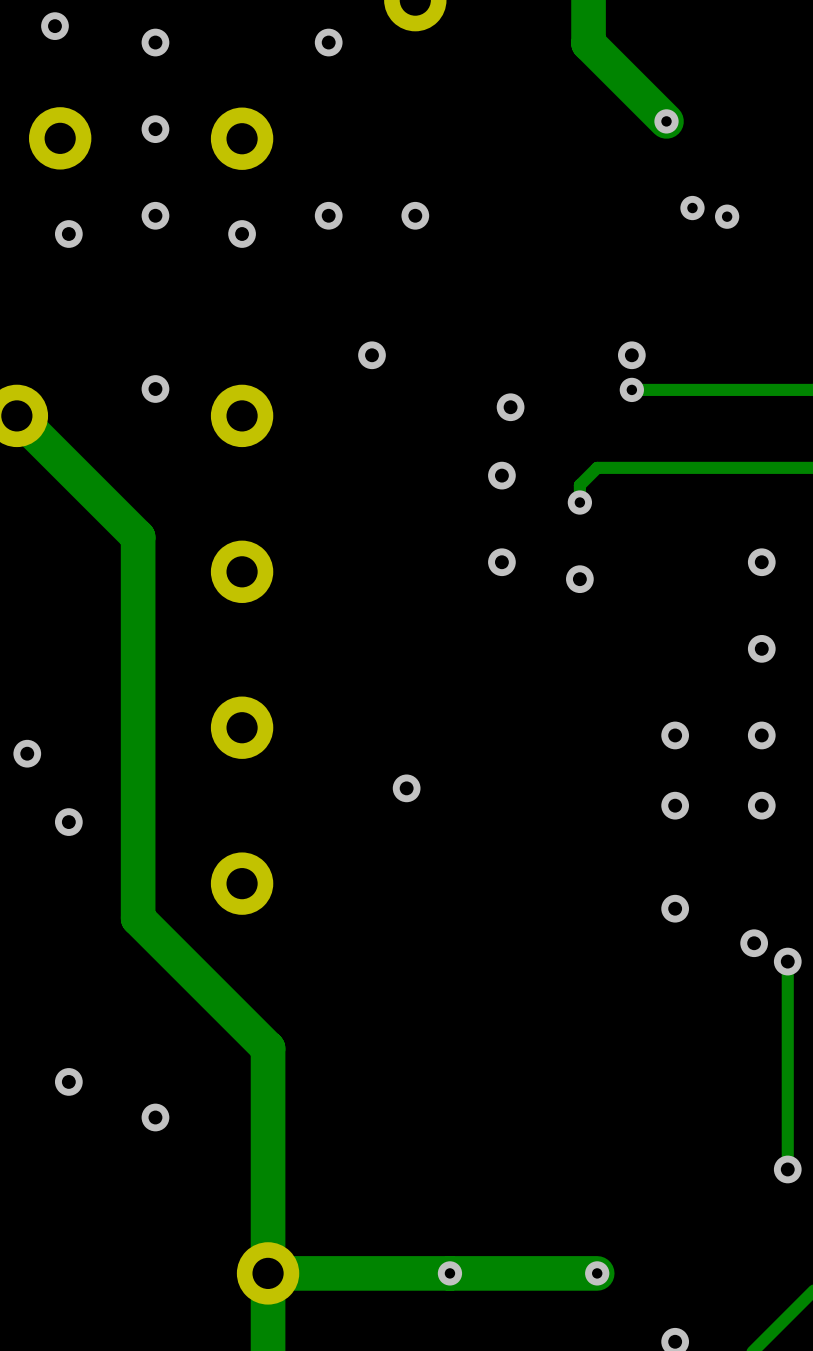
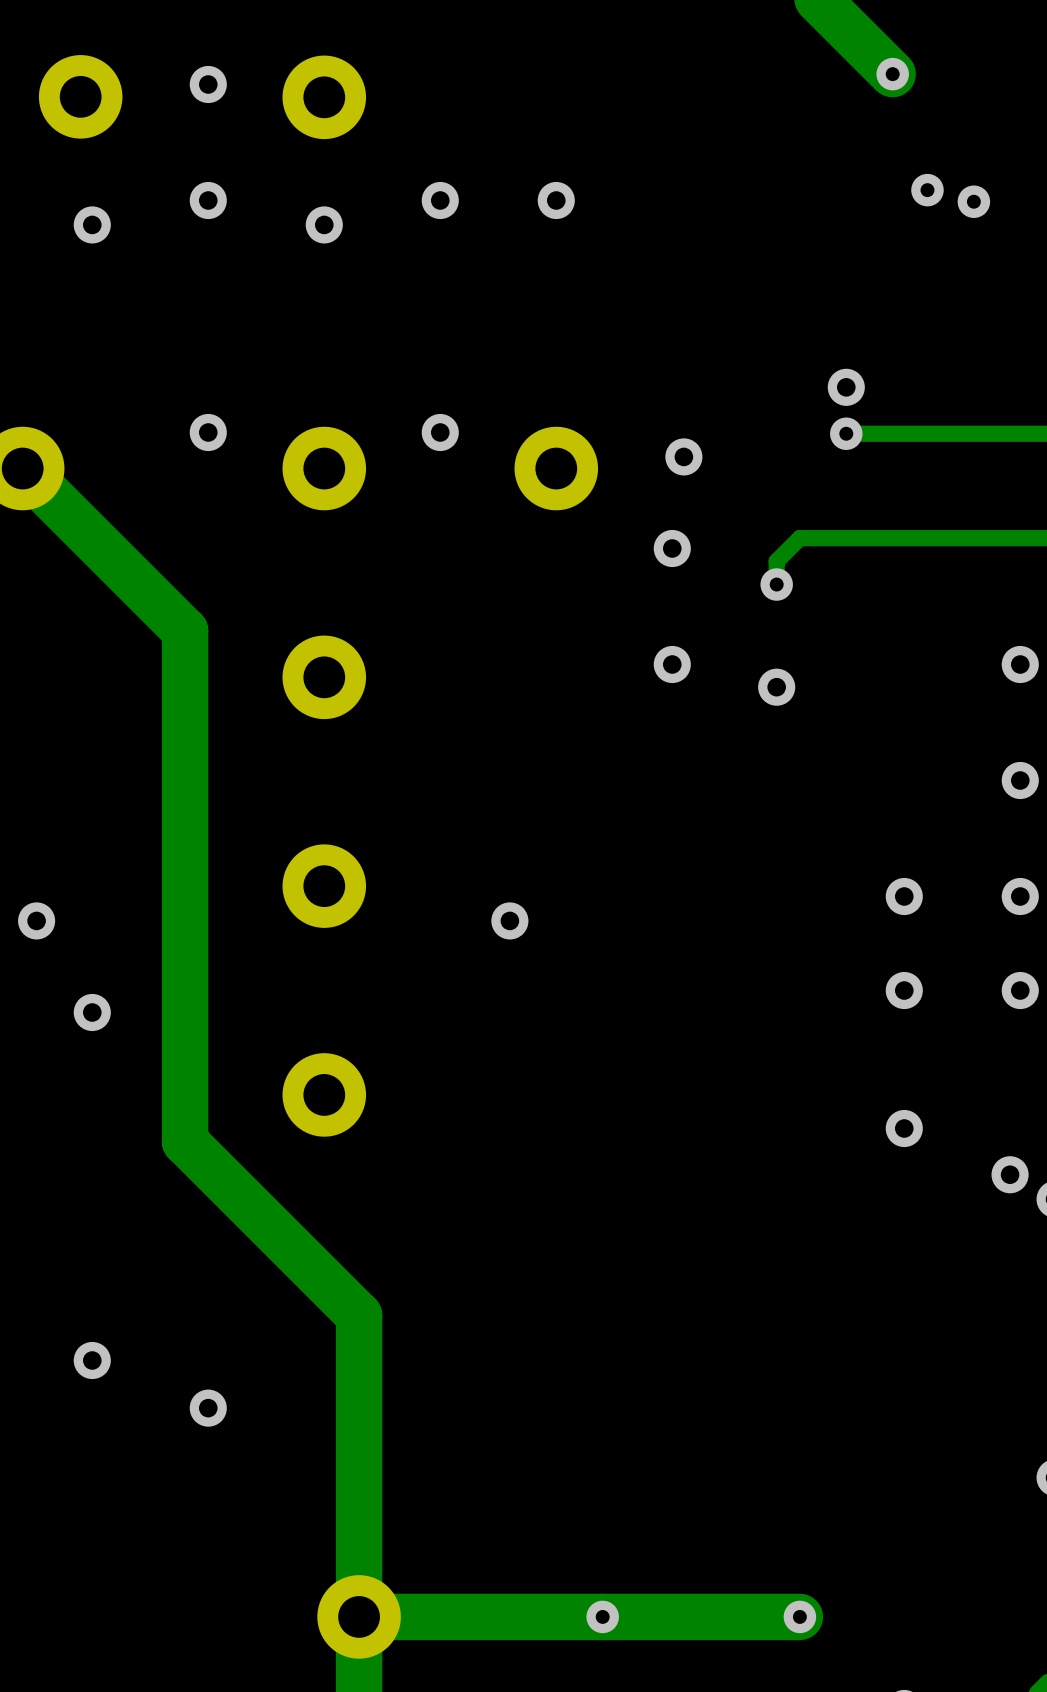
via position: (372, 355) -> (440, 432)
part: none -> (556, 468)
via position: (406, 788) -> (509, 920)

